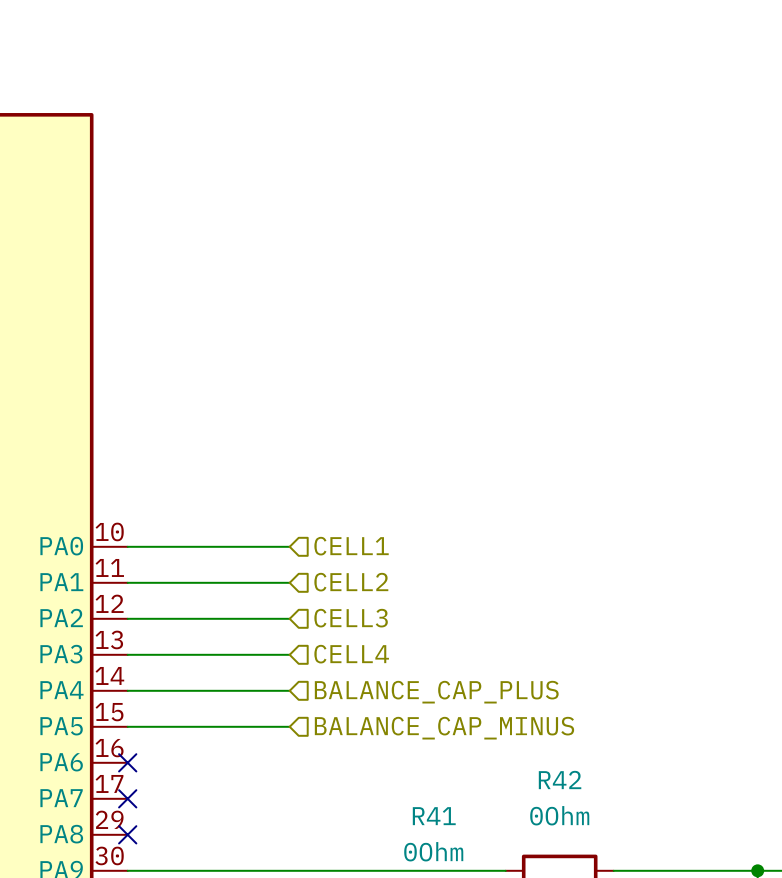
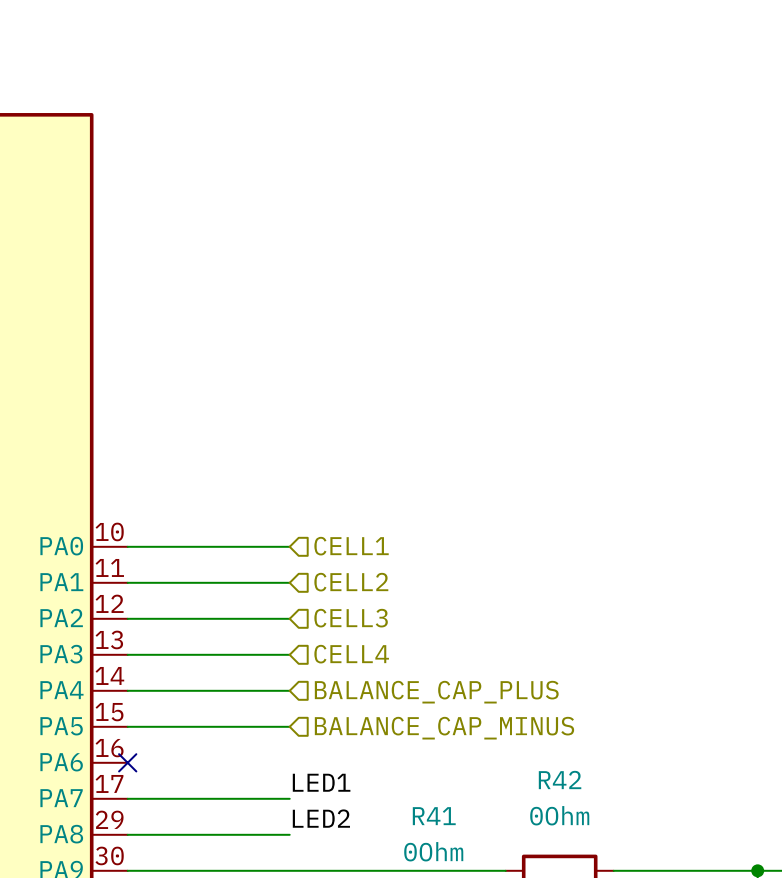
label: none -> LED1 (321, 782)
wire: none -> (127, 798) (289, 798)
no-connect mark: (127, 798) -> none
label: none -> LED2 (321, 818)
wire: none -> (127, 834) (289, 834)
no-connect mark: (127, 834) -> none

